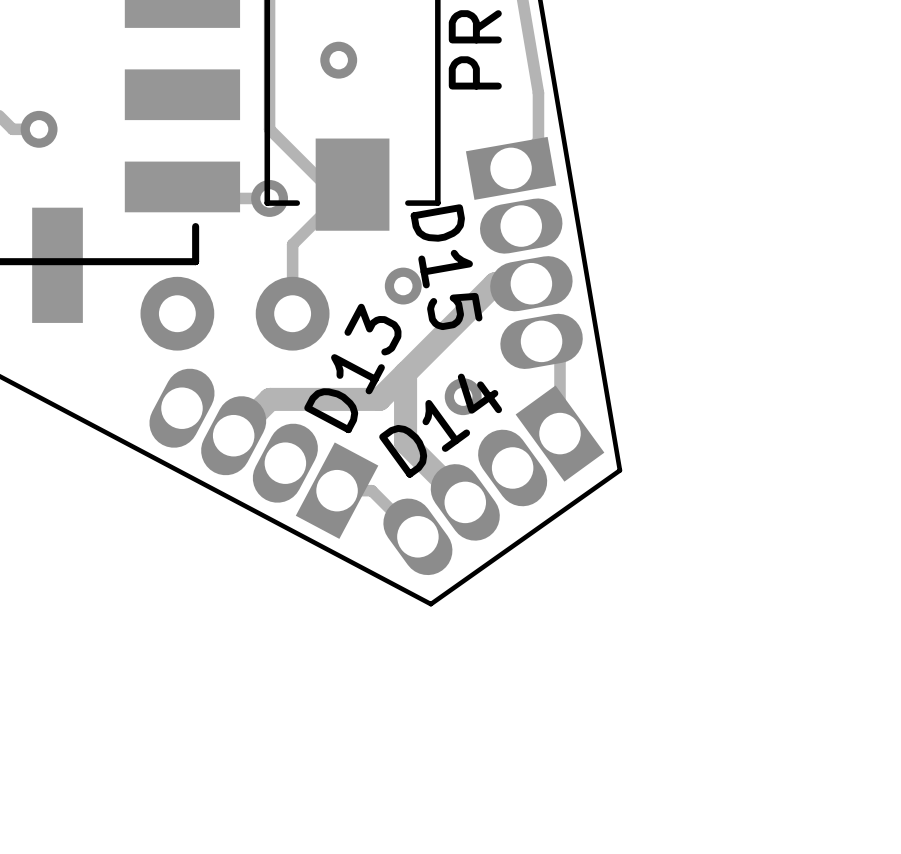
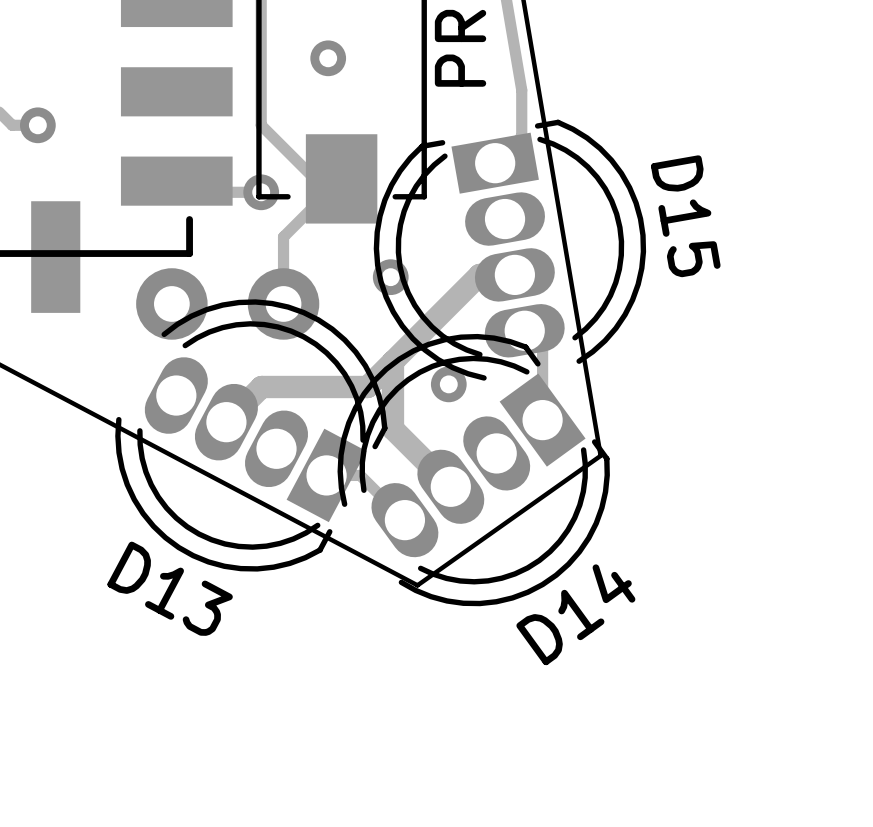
D15 footprint: [465, 136, 583, 369] -> [373, 119, 647, 381]
D15 name position: D15 (446, 267) -> D15 (685, 216)
D13 footprint: [149, 368, 379, 539] -> [115, 299, 388, 572]
D13 name position: D13 (352, 368) -> D13 (170, 588)
D14 footprint: [383, 385, 605, 576] -> [337, 333, 610, 607]
D14 name position: D14 (440, 425) -> D14 (575, 614)

